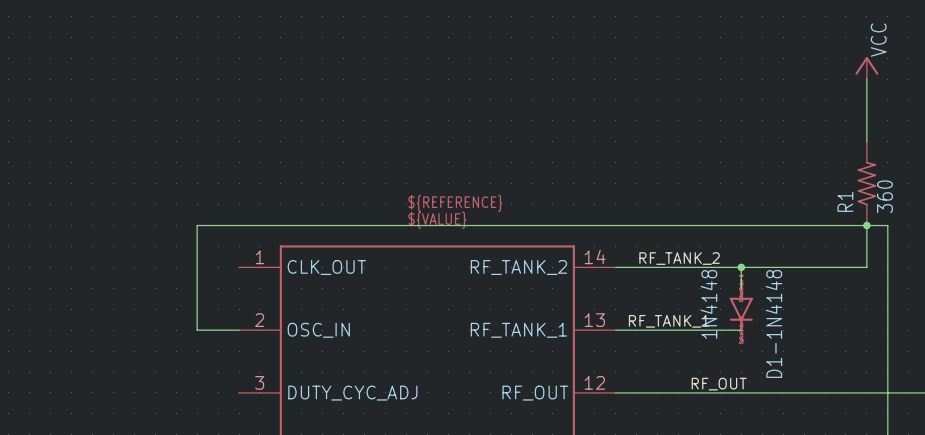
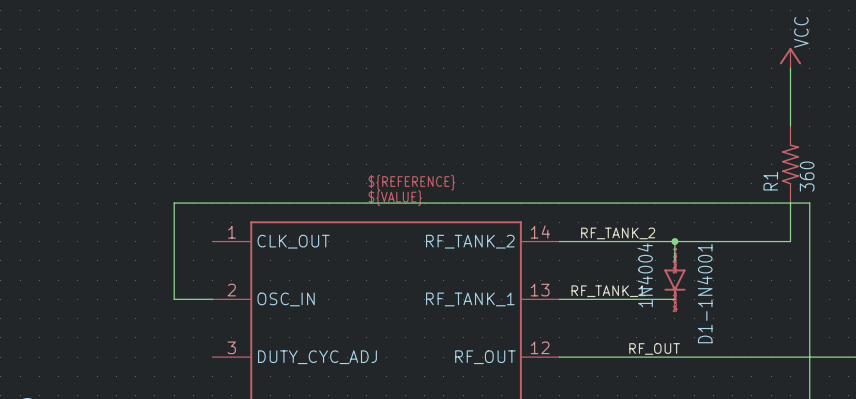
junction: (866, 225) -> none
D1-1N4148 value: 1N4148 (709, 304) -> 1N4004 (645, 275)
D1-1N4148 name: D1-1N4148 (773, 323) -> D1-1N4001 (704, 293)

